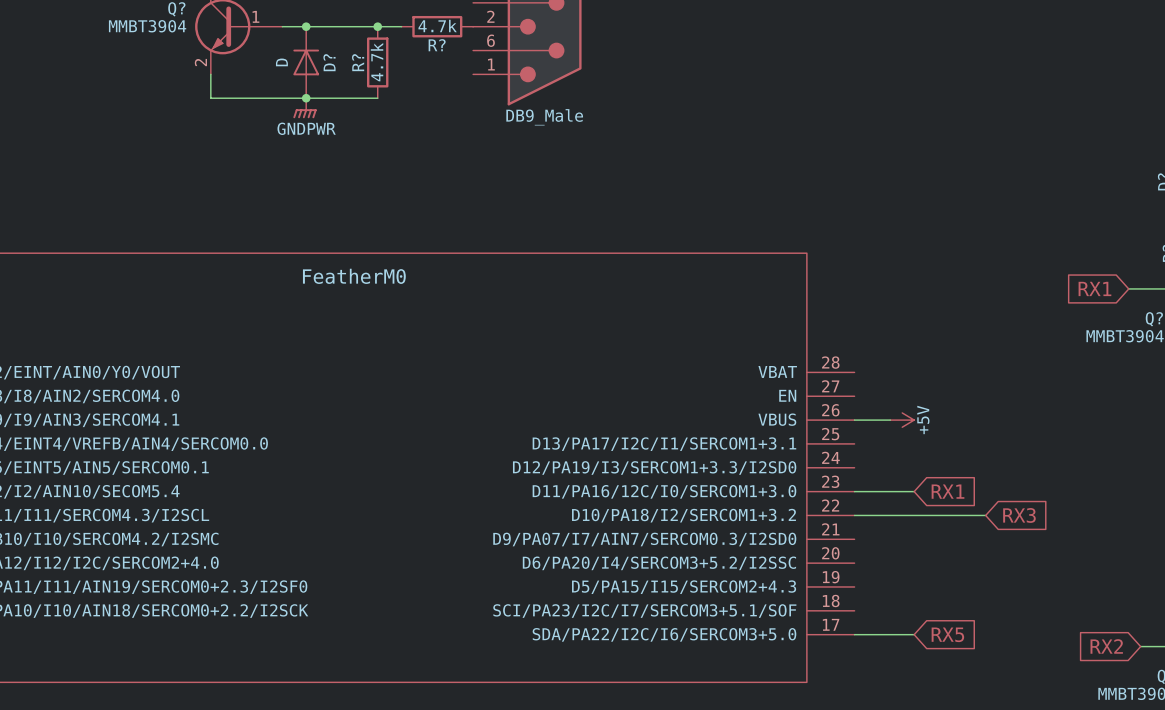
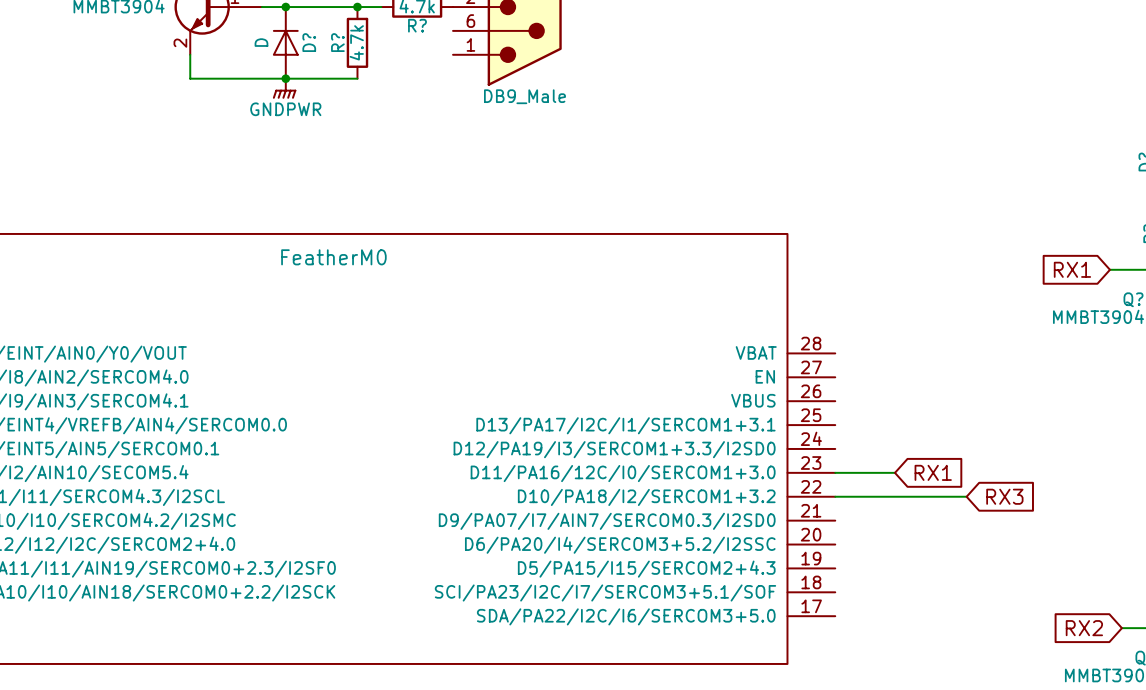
wire: (854, 420) (890, 420) -> none
power symbol: +5V (902, 420) -> none
wire: (854, 634) (914, 634) -> none
global label: RX5 (947, 634) -> none

